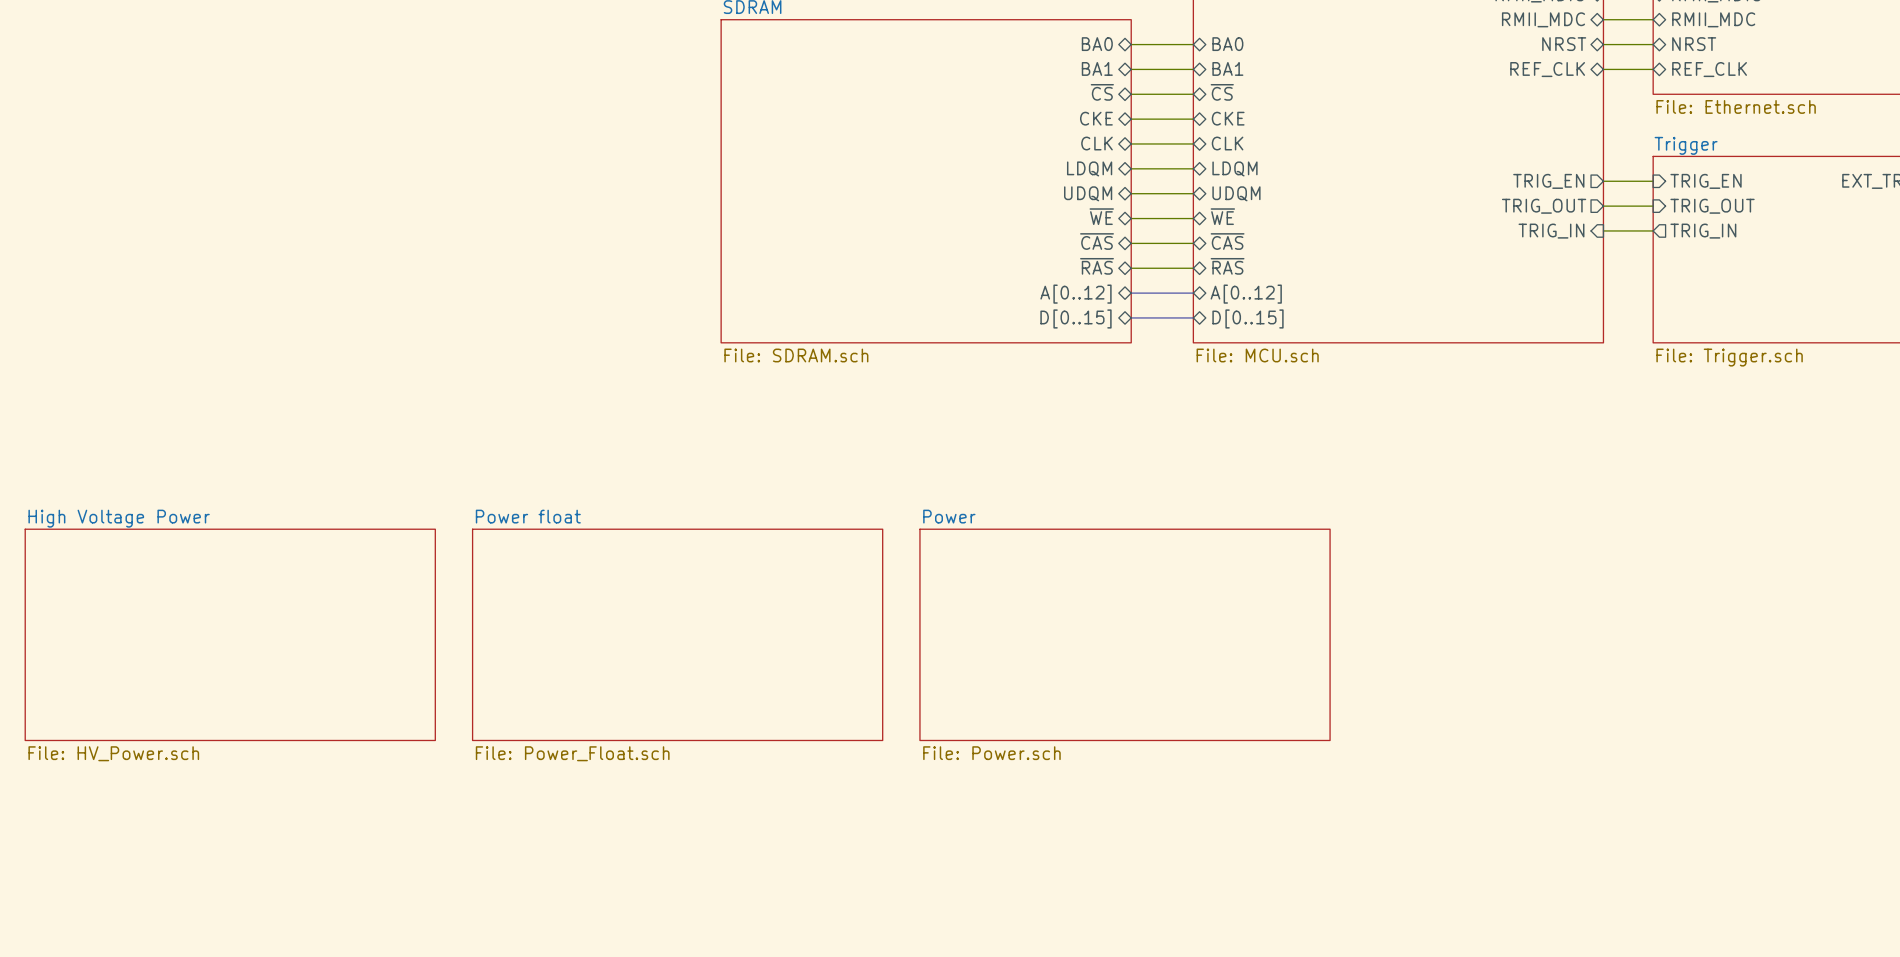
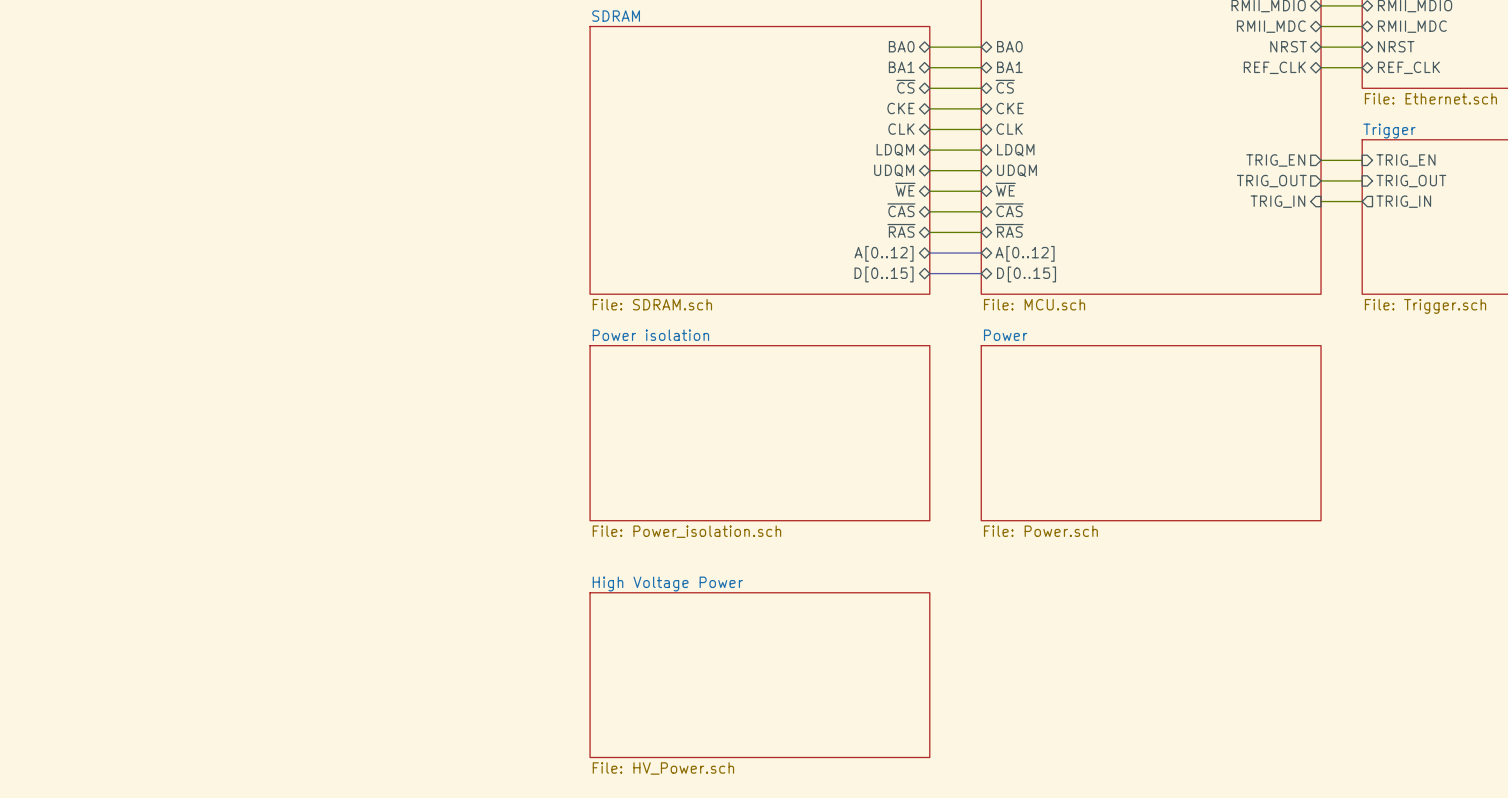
sheet Power isolation: none -> File: Power_isolation.sch (759, 433)
sheet Power: none -> File: Power.sch (1151, 433)
sheet High Voltage Power: File: HV_Power.sch (230, 634) -> none
sheet Power float: File: Power_Float.sch (677, 634) -> none
sheet Power: File: Power.sch (1125, 634) -> none
sheet High Voltage Power: none -> File: HV_Power.sch (759, 675)

